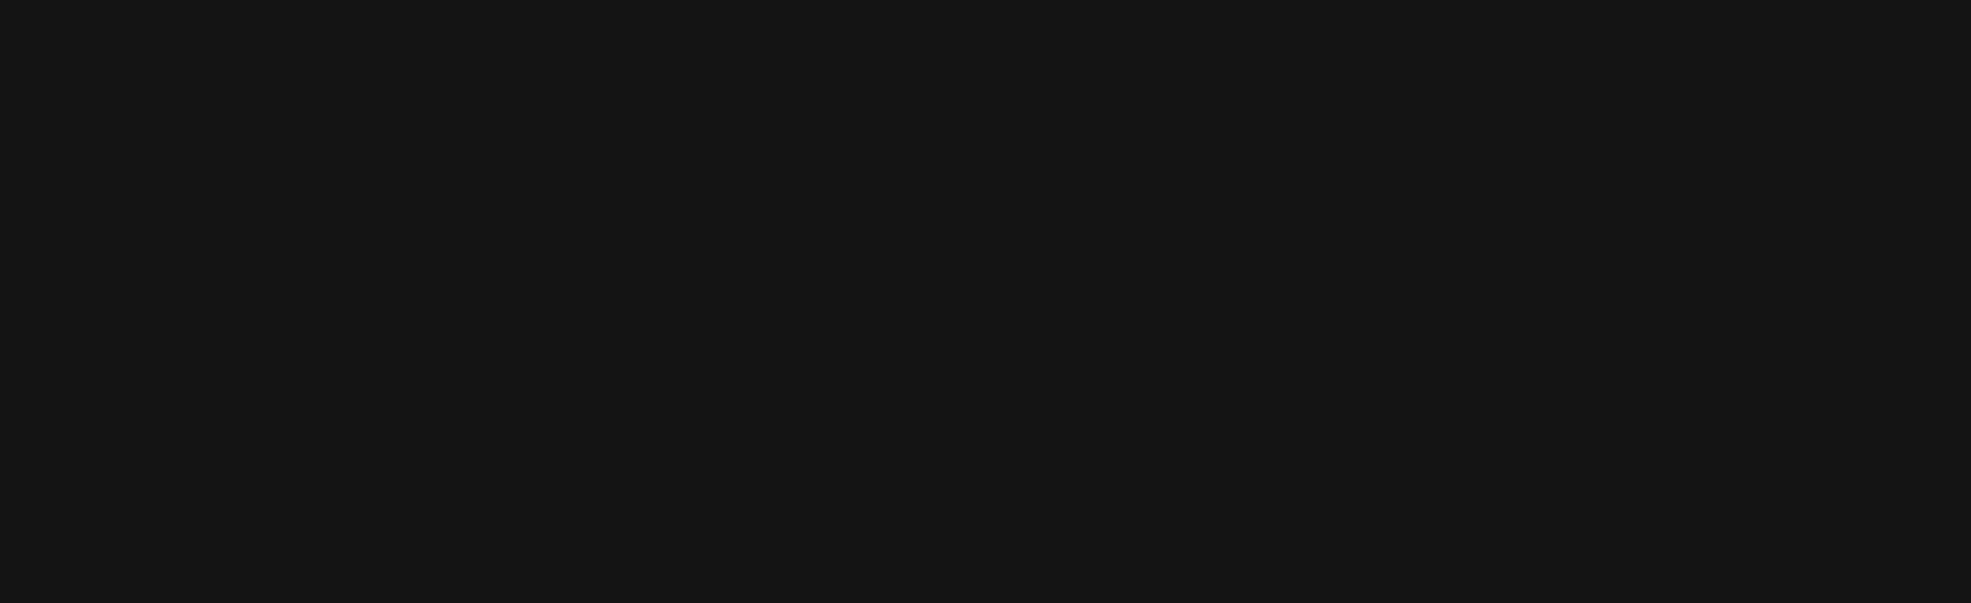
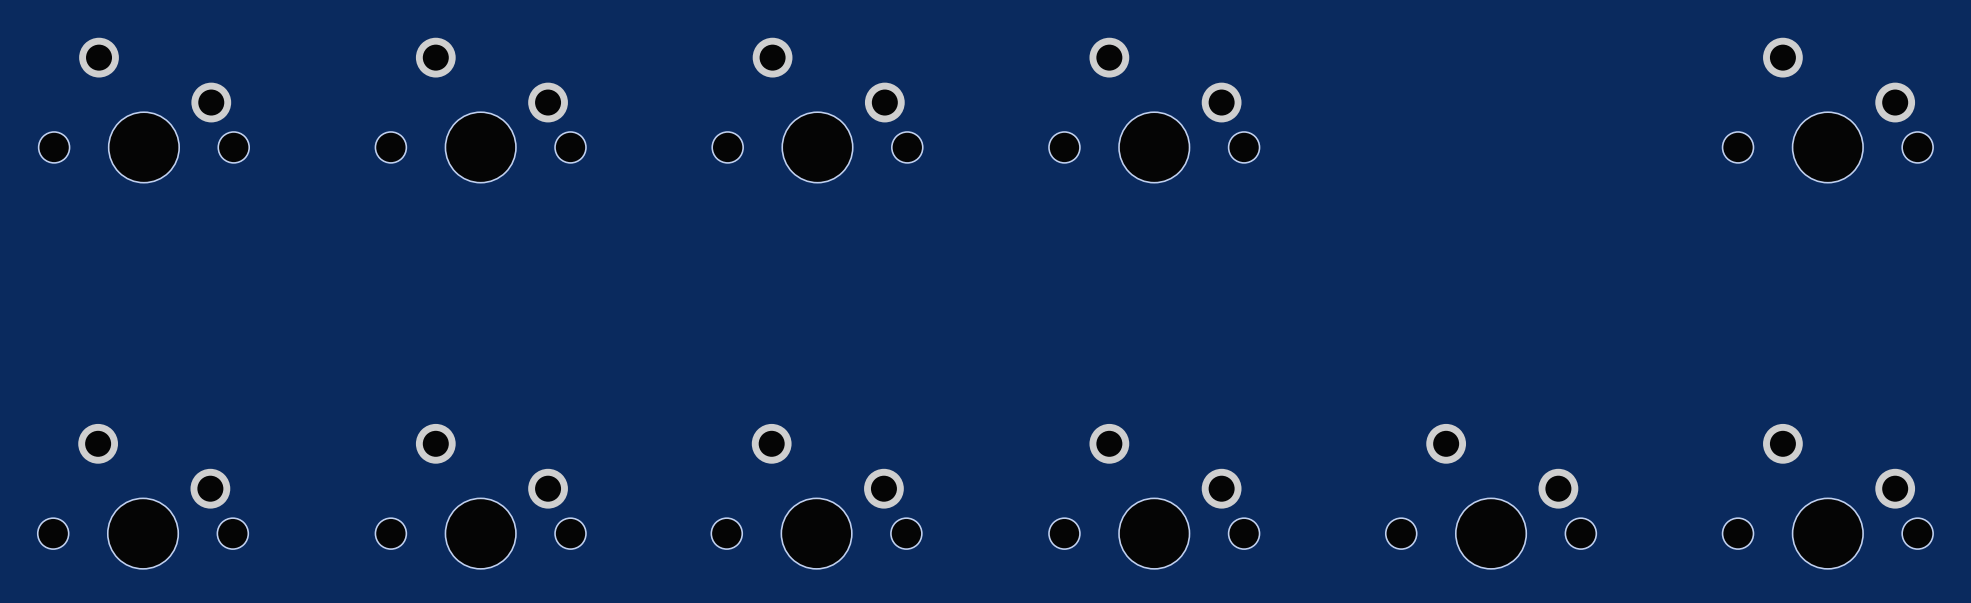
part: none -> (143, 110)
part: none -> (480, 110)
part: none -> (817, 110)
part: none -> (1154, 110)
part: none -> (1827, 110)
part: none -> (143, 496)
part: none -> (480, 496)
part: none -> (816, 496)
part: none -> (1154, 496)
part: none -> (1491, 496)
part: none -> (1827, 496)

